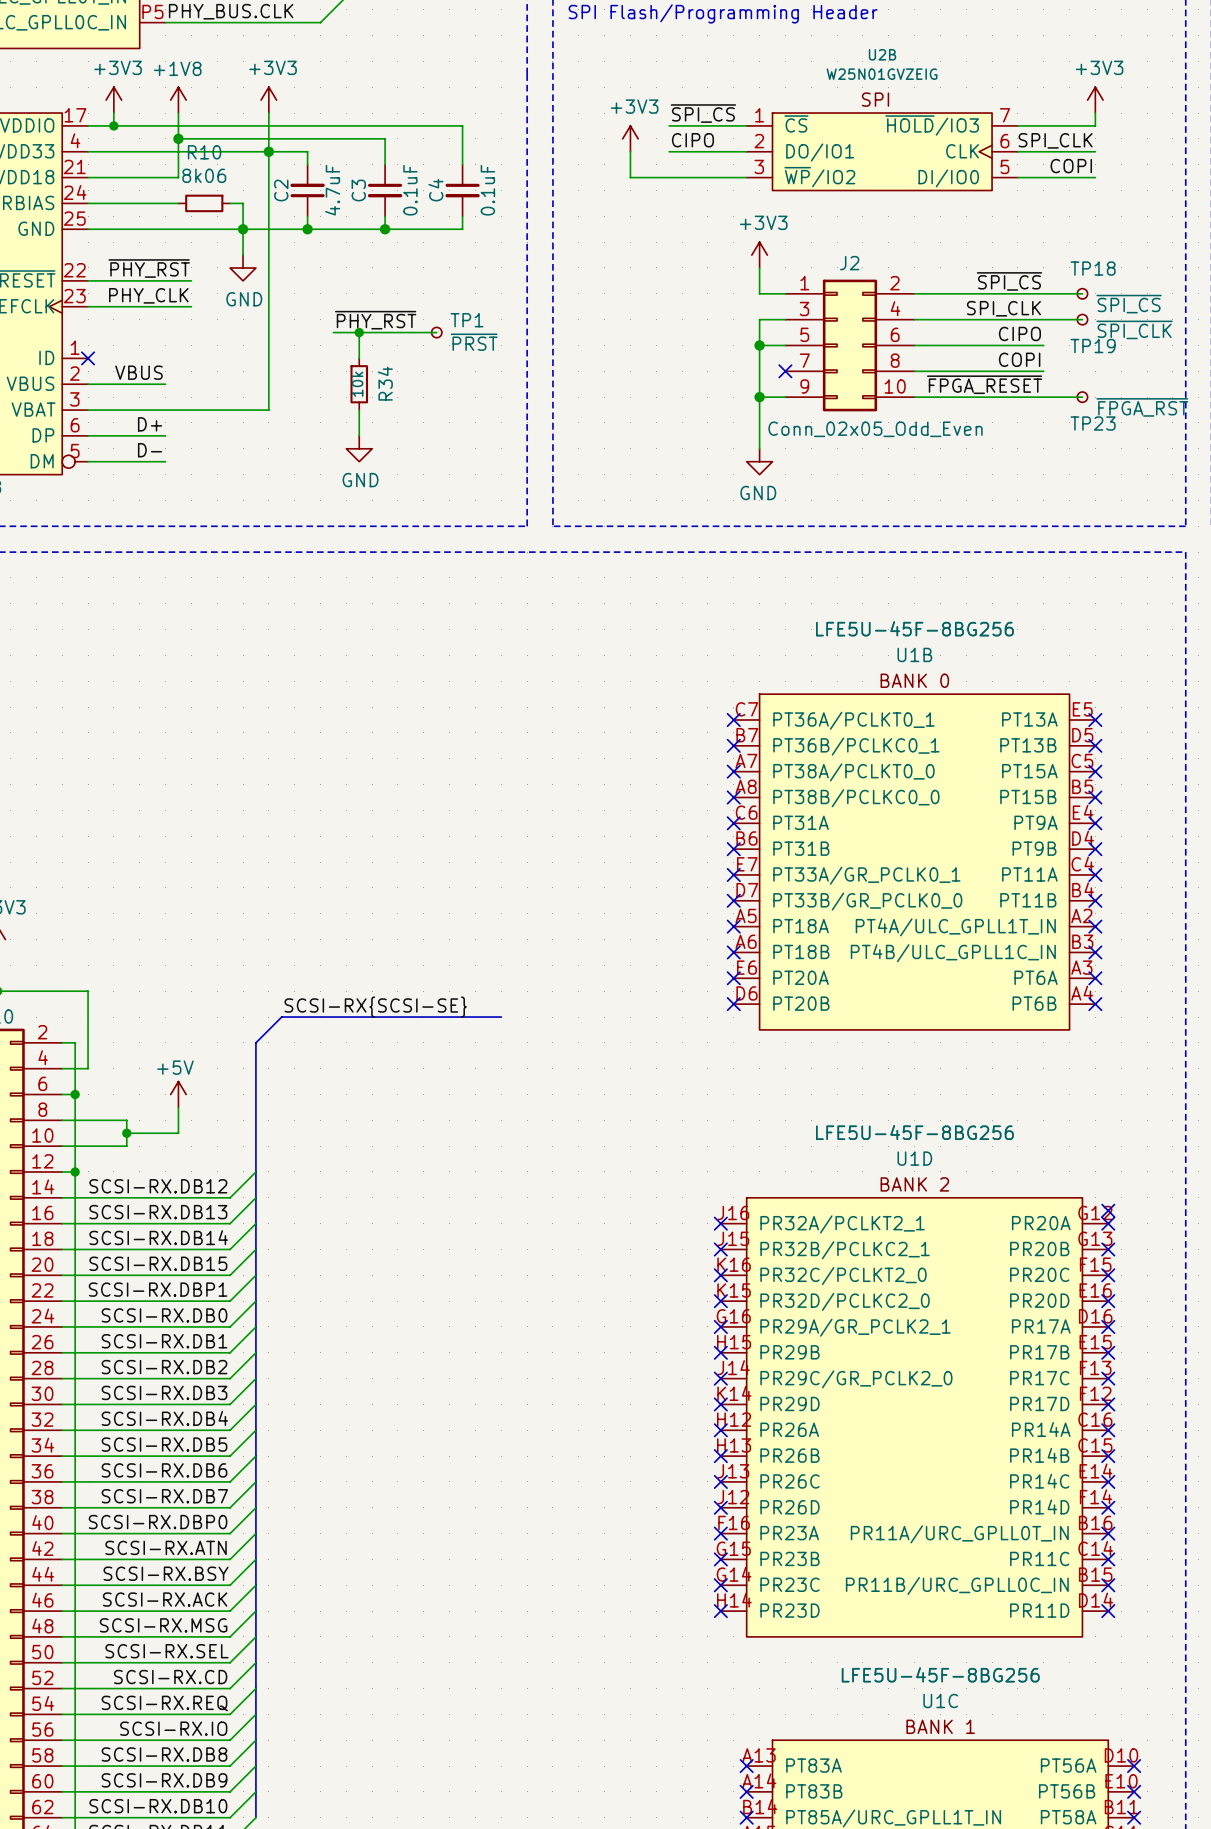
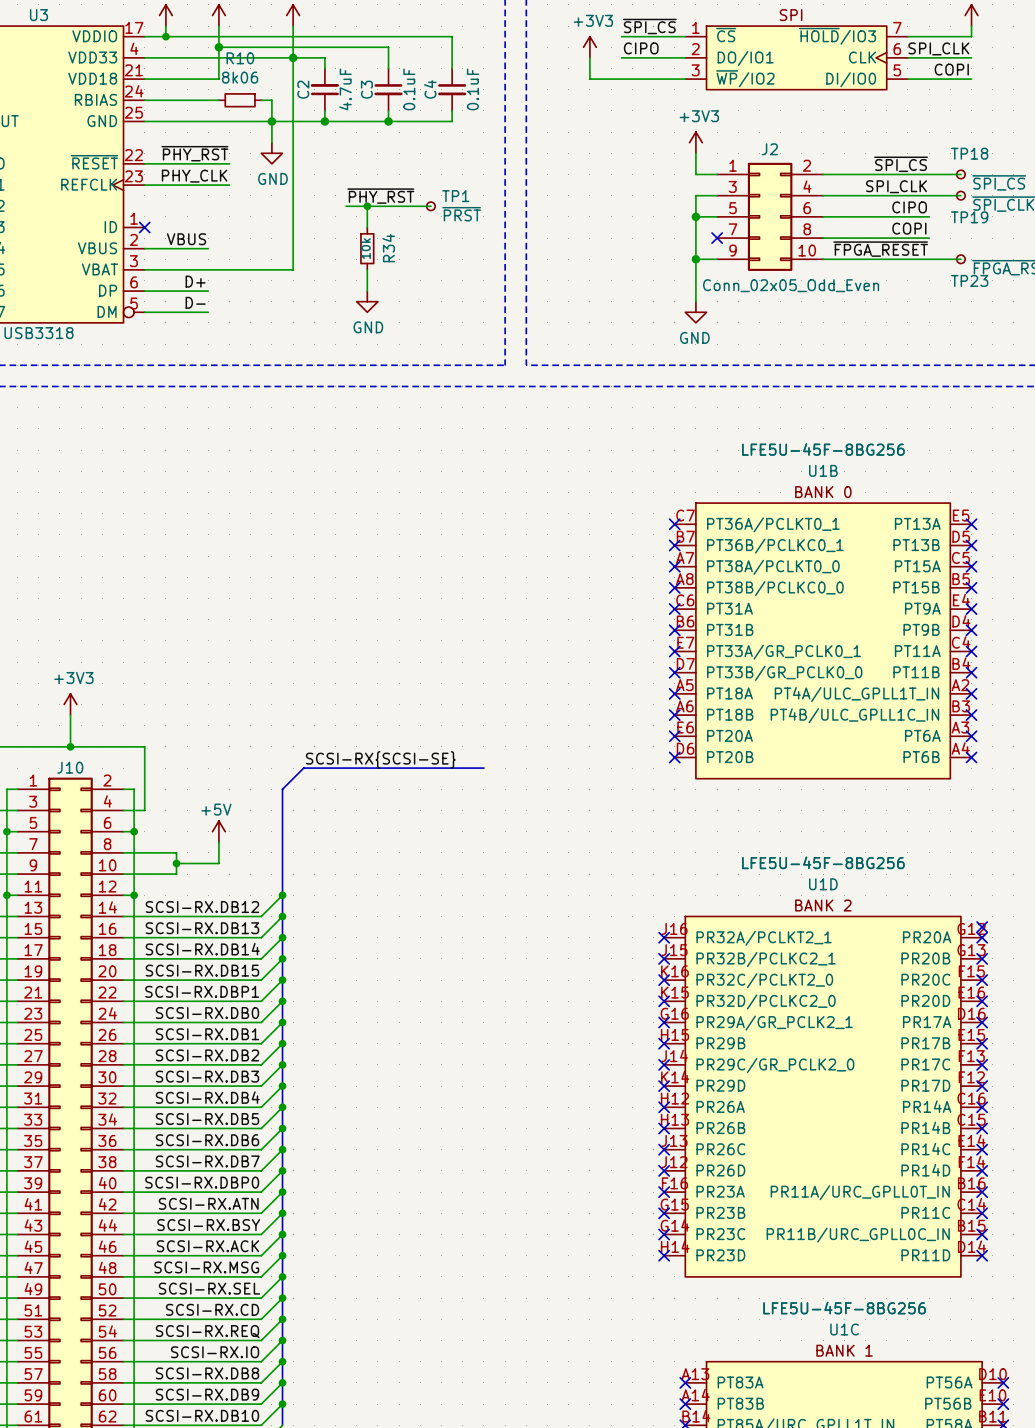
junction: none -> (282, 895)
junction: none -> (282, 916)
junction: none -> (282, 937)
junction: none -> (282, 958)
junction: none -> (282, 980)
junction: none -> (282, 1001)
junction: none -> (282, 1022)
junction: none -> (282, 1043)
junction: none -> (282, 1064)
junction: none -> (282, 1086)
junction: none -> (282, 1107)
junction: none -> (282, 1128)
junction: none -> (282, 1149)
junction: none -> (282, 1170)
junction: none -> (282, 1192)
junction: none -> (282, 1213)
junction: none -> (282, 1234)
junction: none -> (282, 1255)
junction: none -> (282, 1276)
junction: none -> (282, 1298)
junction: none -> (282, 1319)
junction: none -> (282, 1340)
junction: none -> (282, 1361)
junction: none -> (282, 1382)
junction: none -> (282, 1404)

